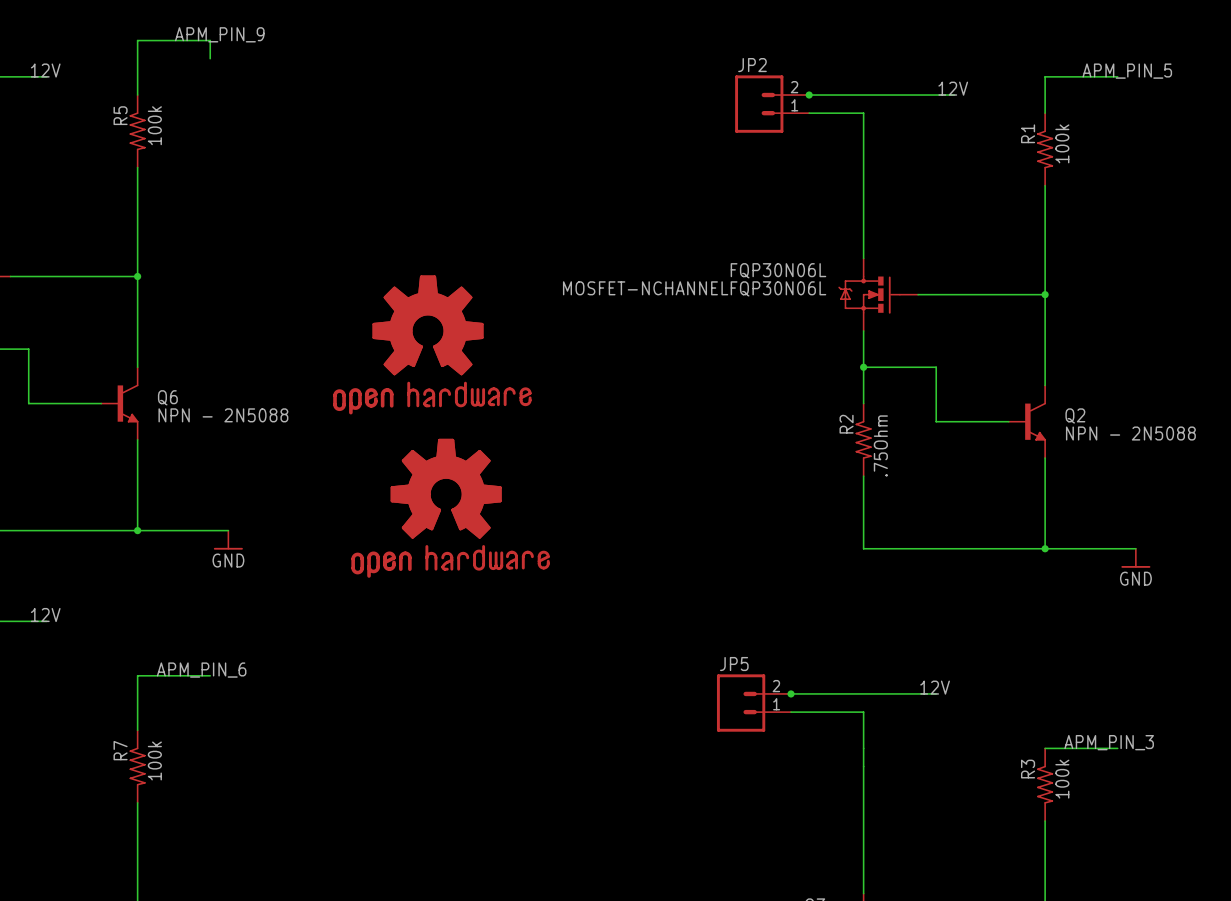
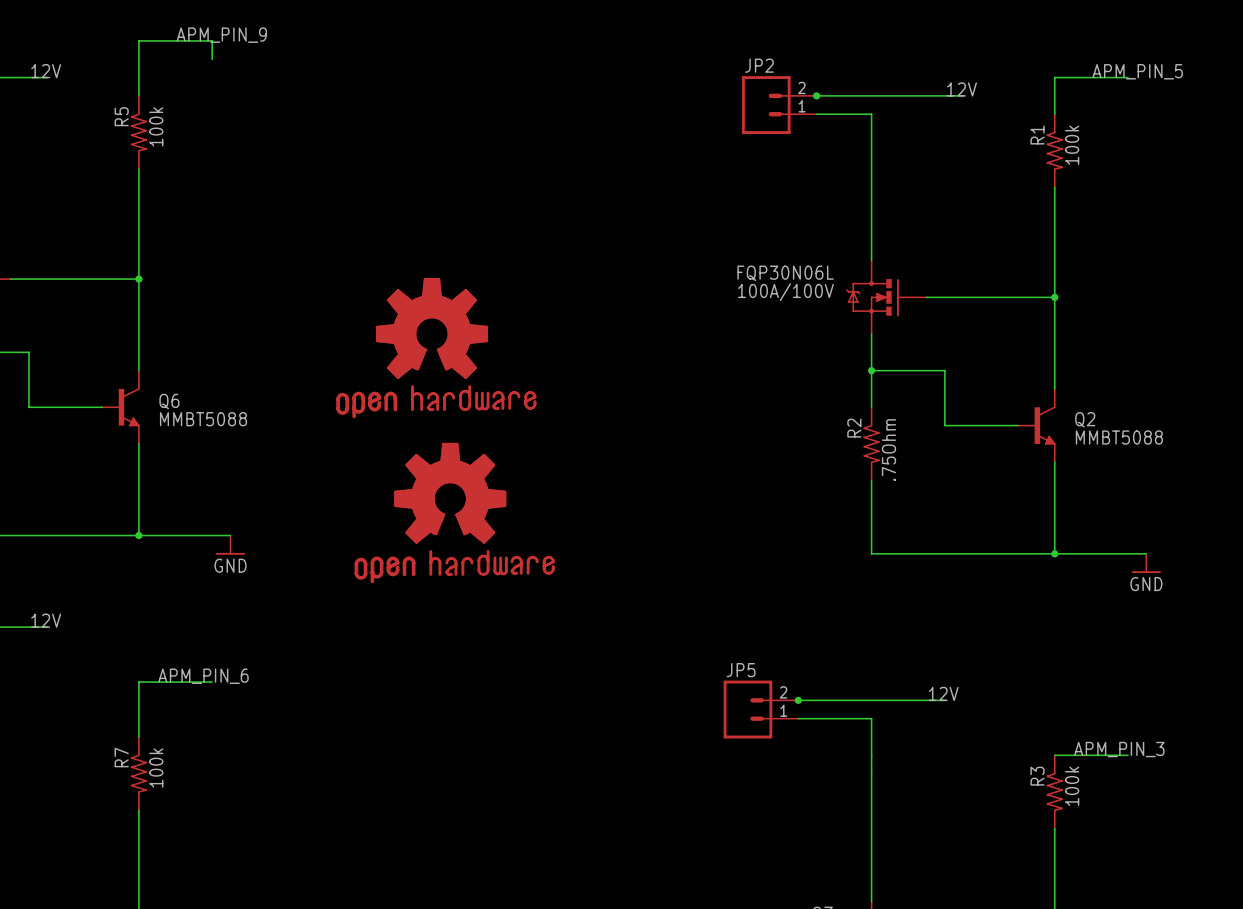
FQP30N06L value: MOSFET-NCHANNELFQP30N06L (694, 288) -> 100A/100V (785, 292)
Q6 value: NPN - 2N5088 (223, 415) -> MMBT5088 (203, 419)
Q2 value: NPN - 2N5088 (1130, 433) -> MMBT5088 (1119, 437)

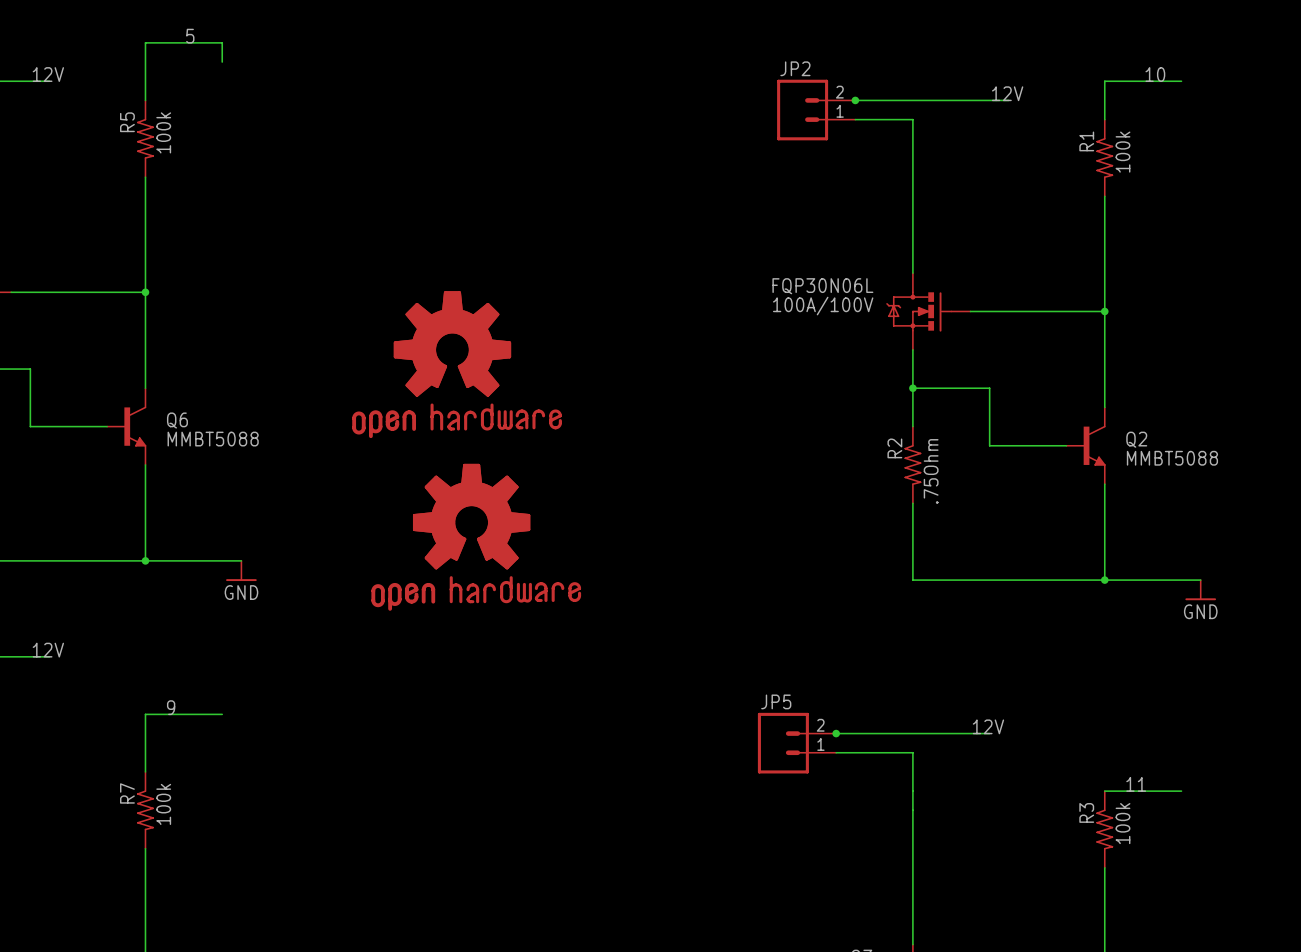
label: APM_PIN_9 (221, 35) -> 5 (190, 36)
label: APM_PIN_5 (1137, 71) -> 10 (1155, 74)
label: APM_PIN_6 (203, 676) -> 9 (171, 707)
label: APM_PIN_3 (1119, 749) -> 11 (1136, 784)

